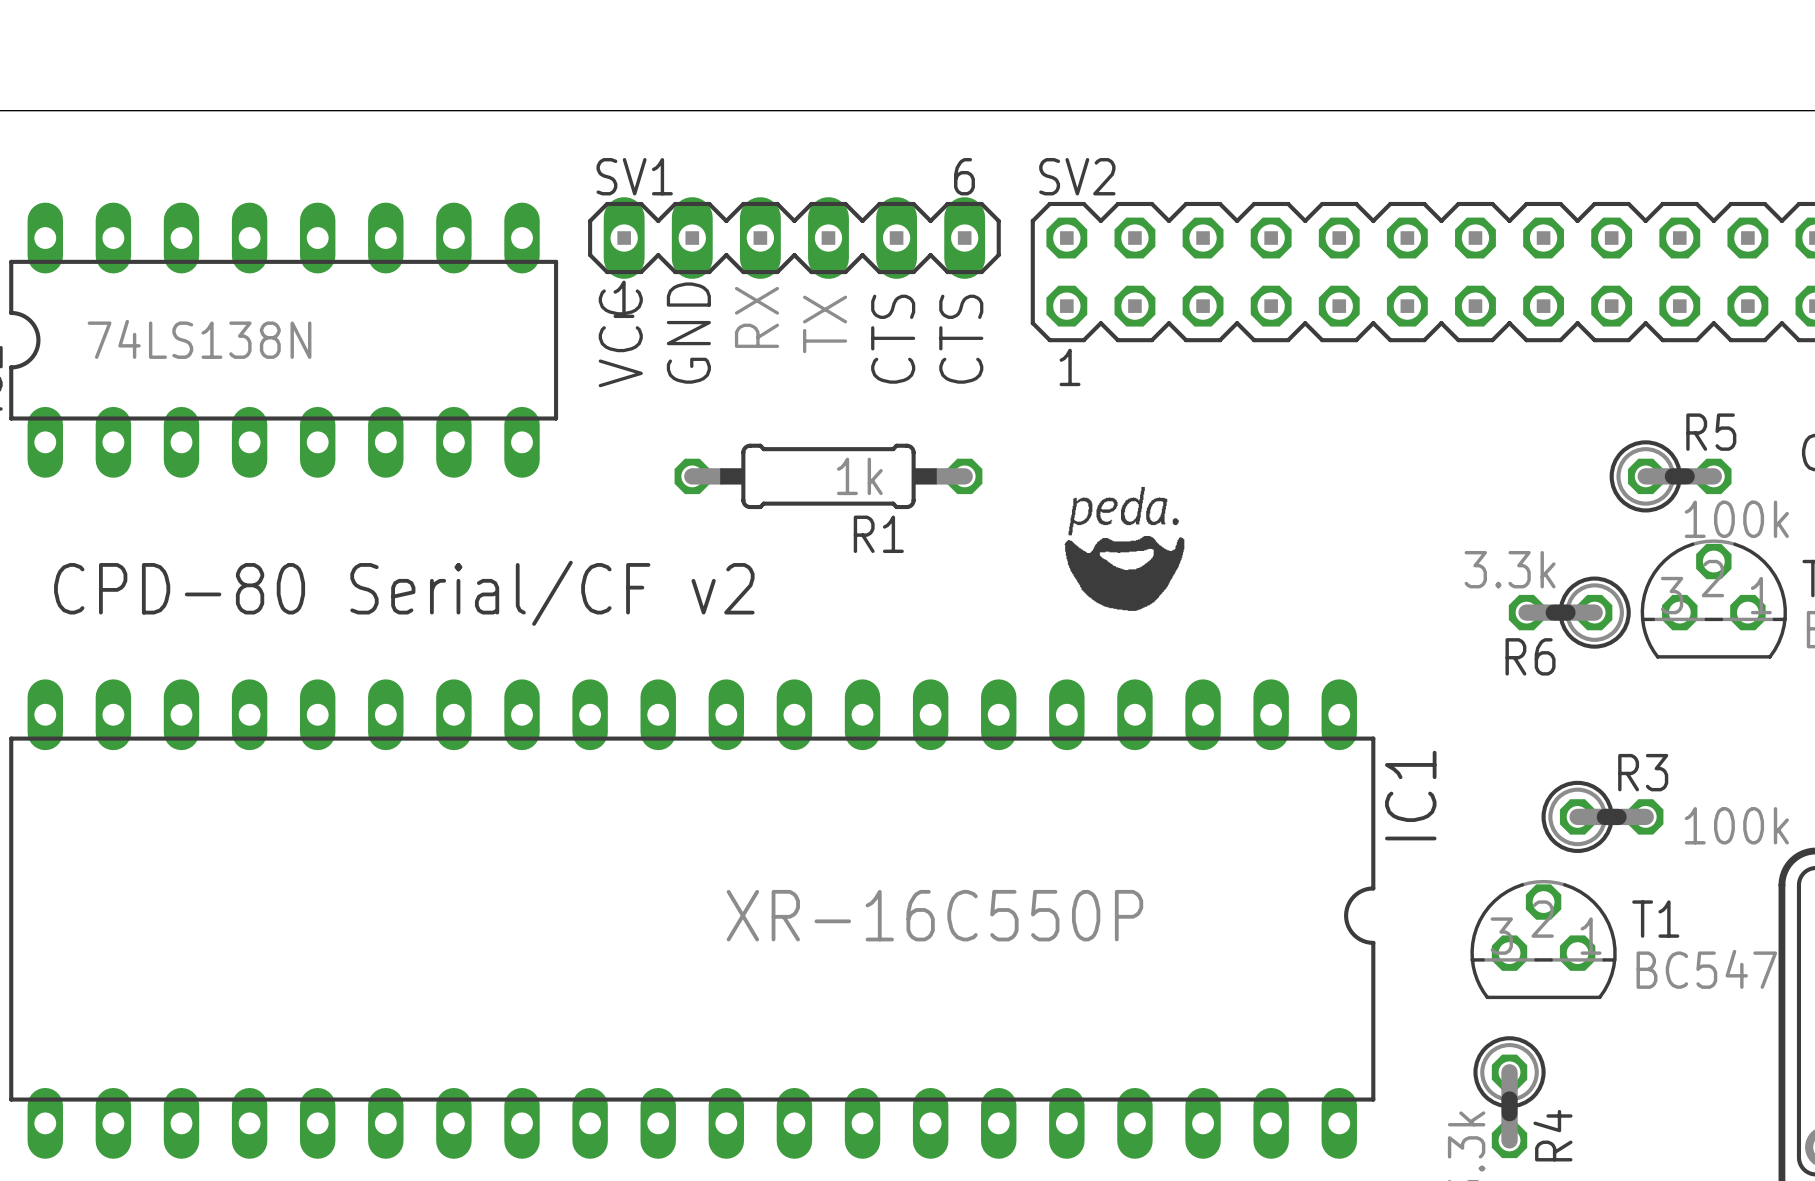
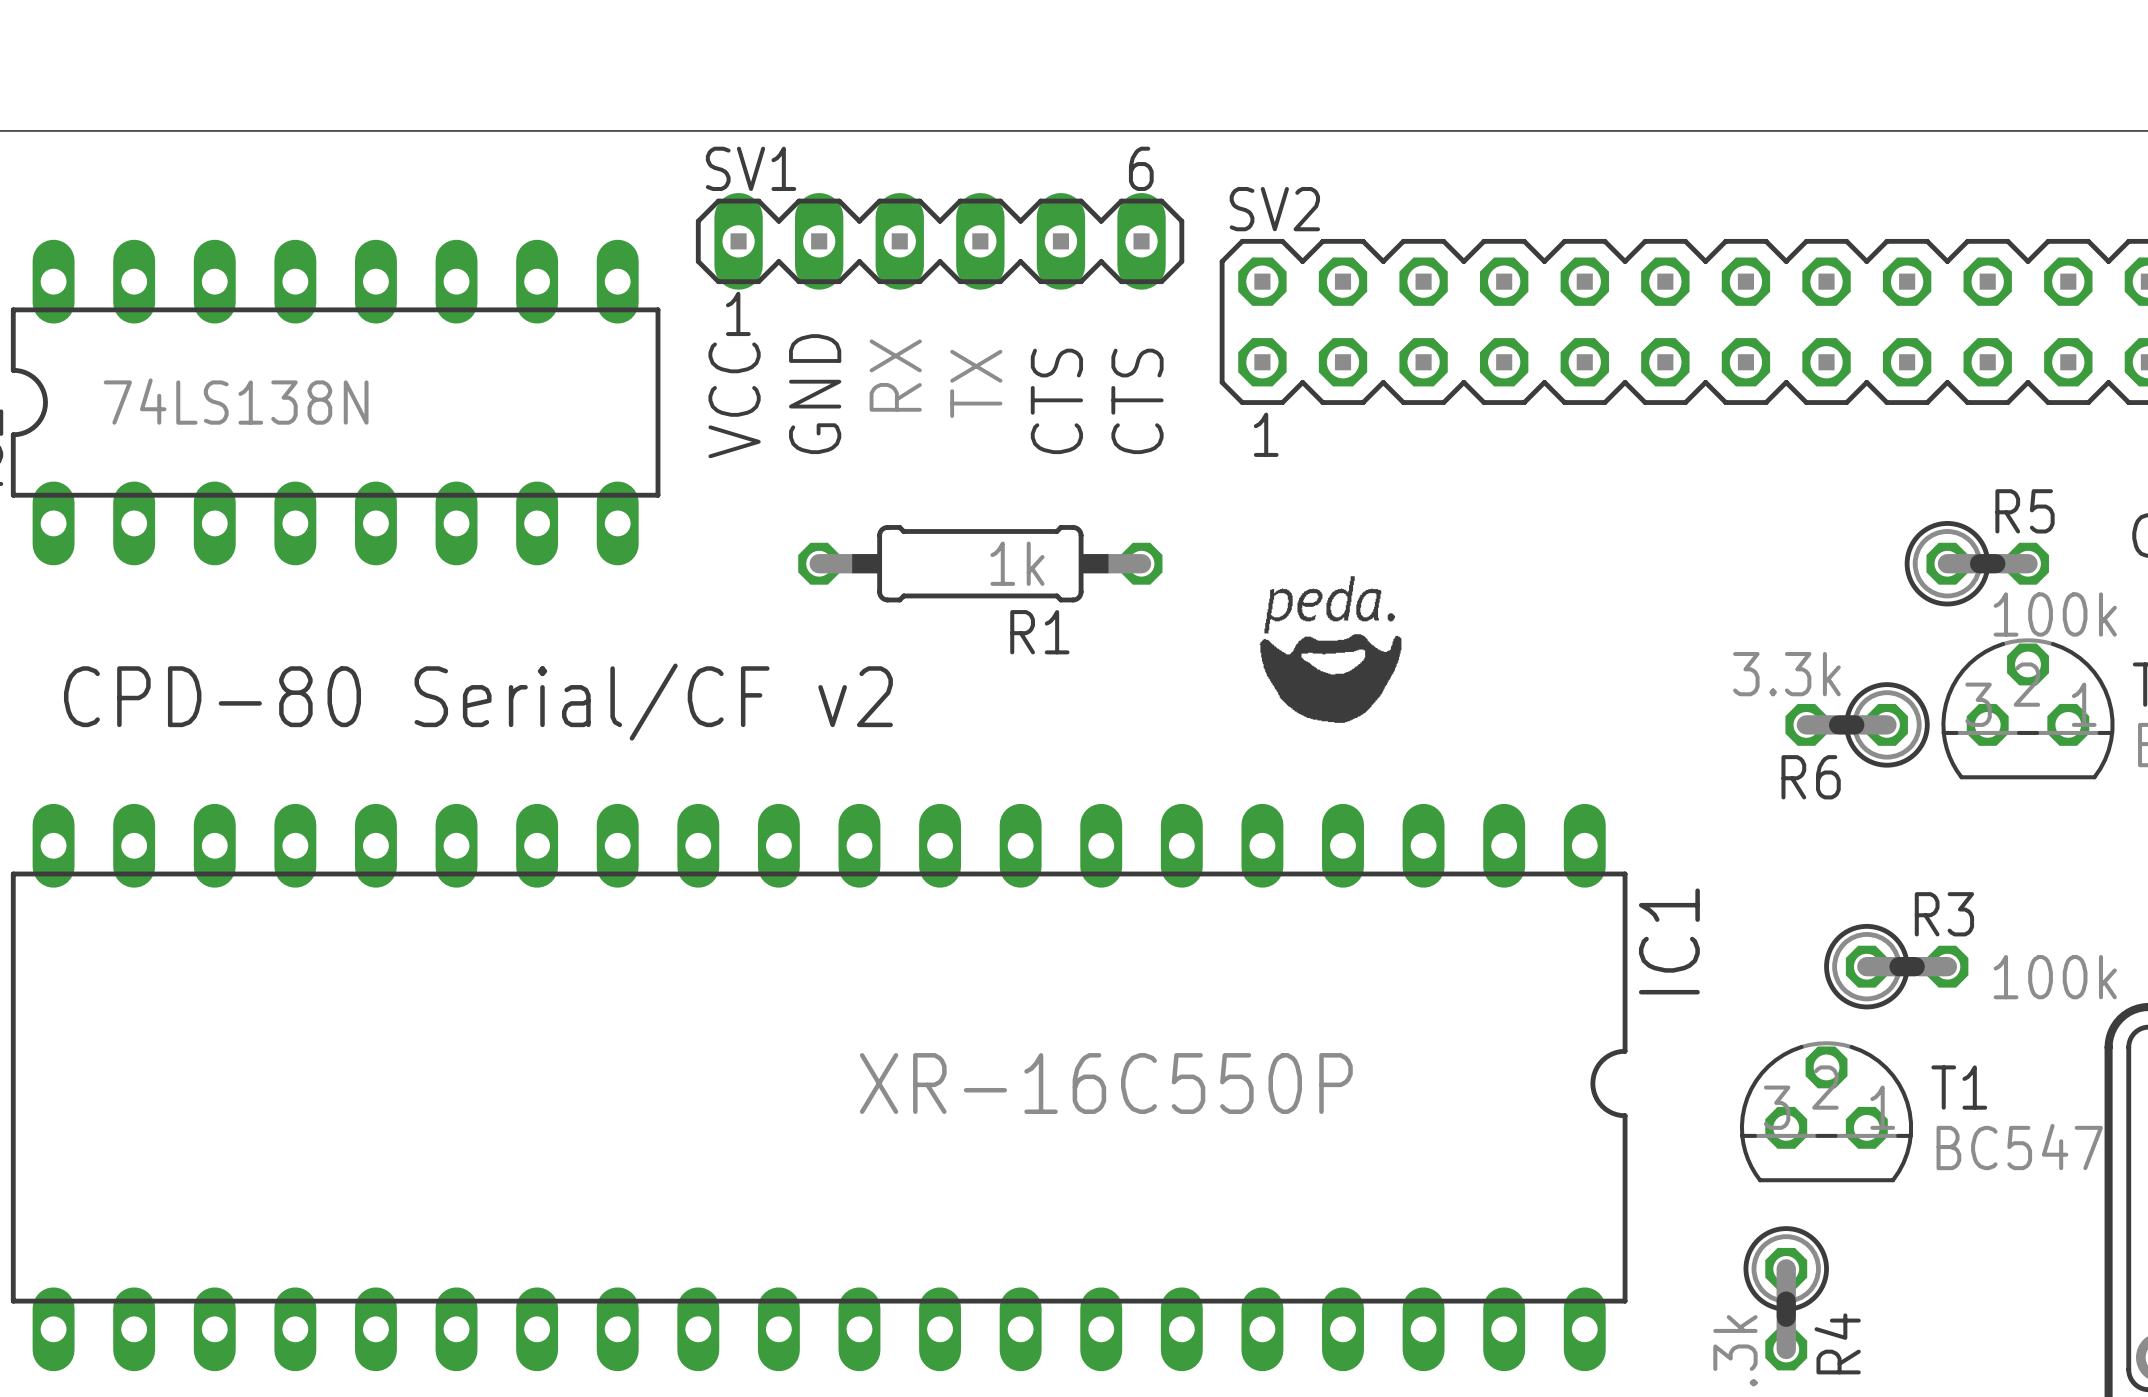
SV1 position: (794, 238) -> (940, 241)

